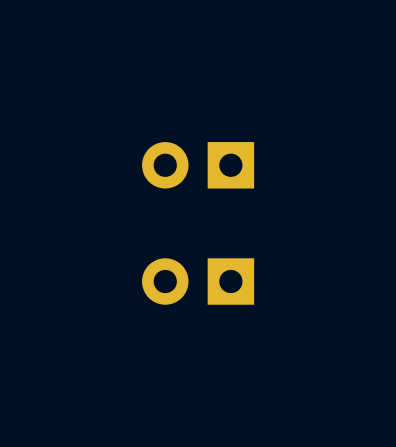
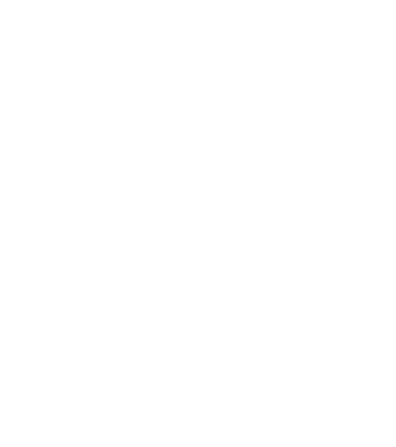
part: (198, 165) -> none
part: (198, 281) -> none

